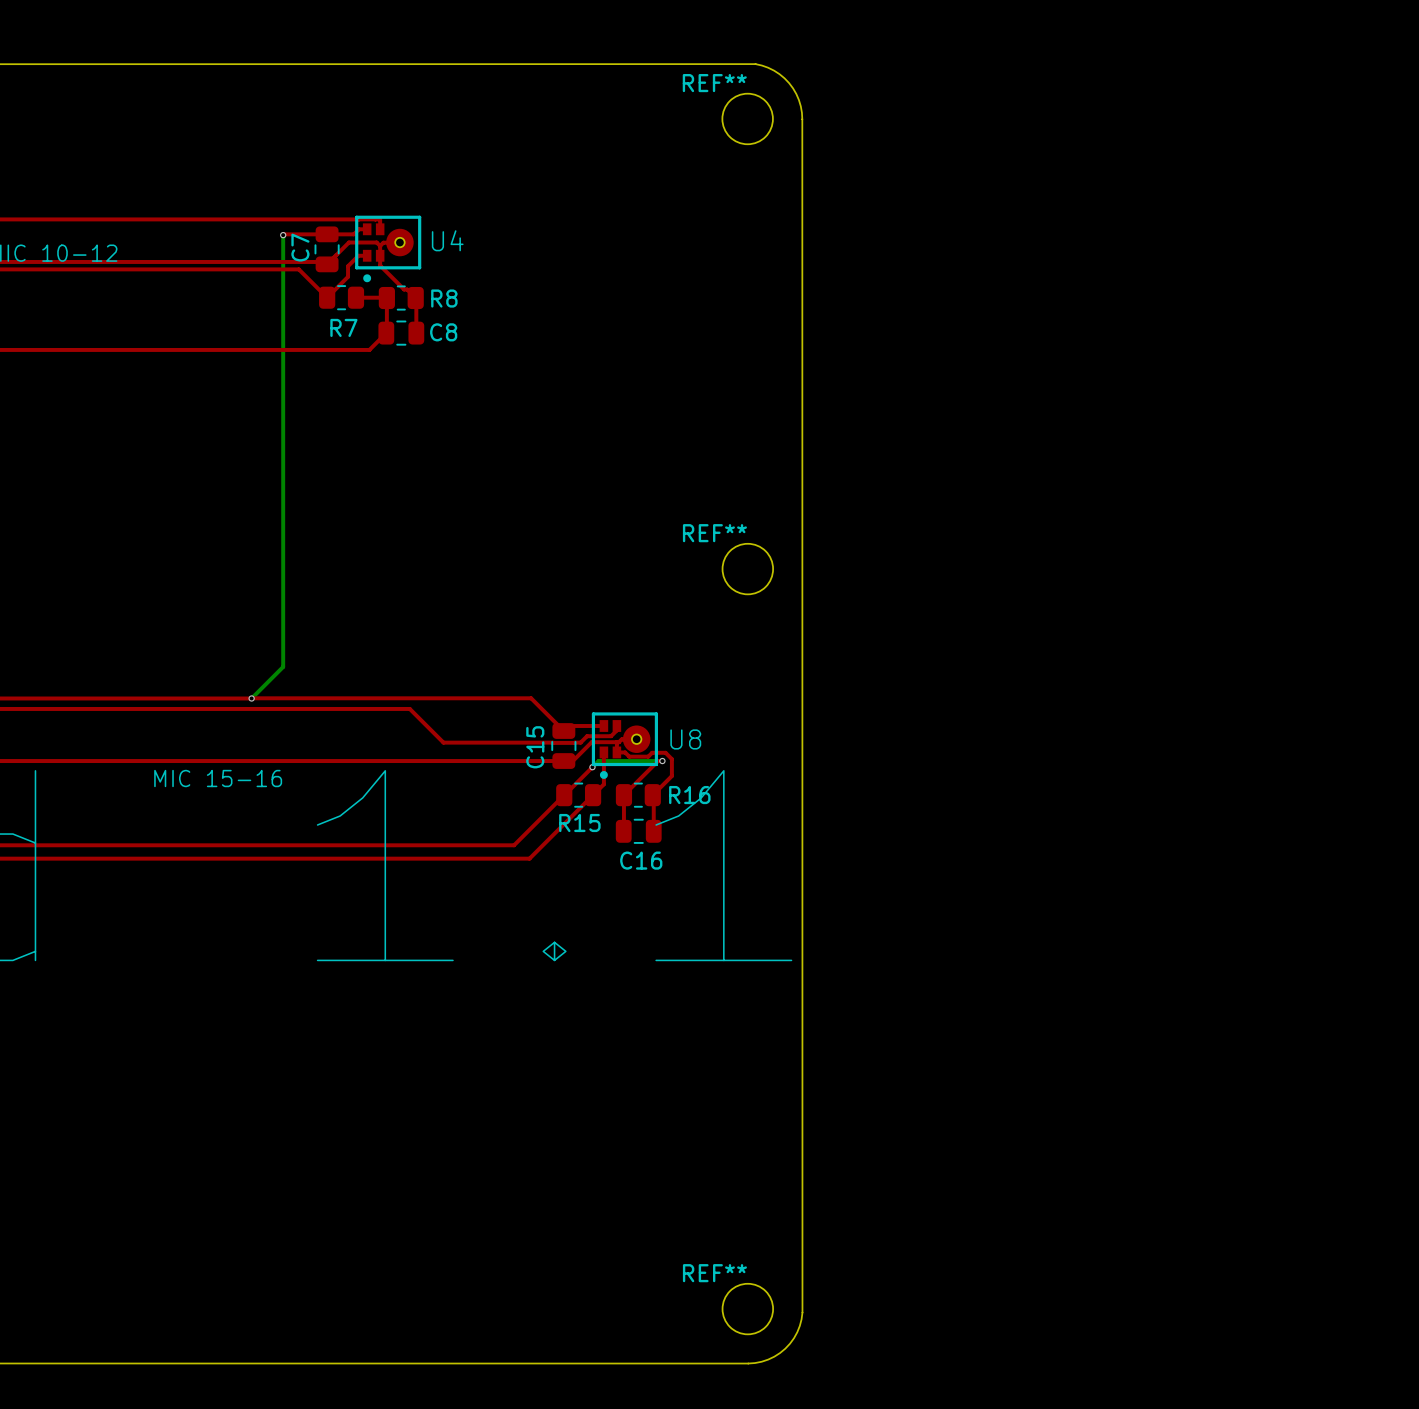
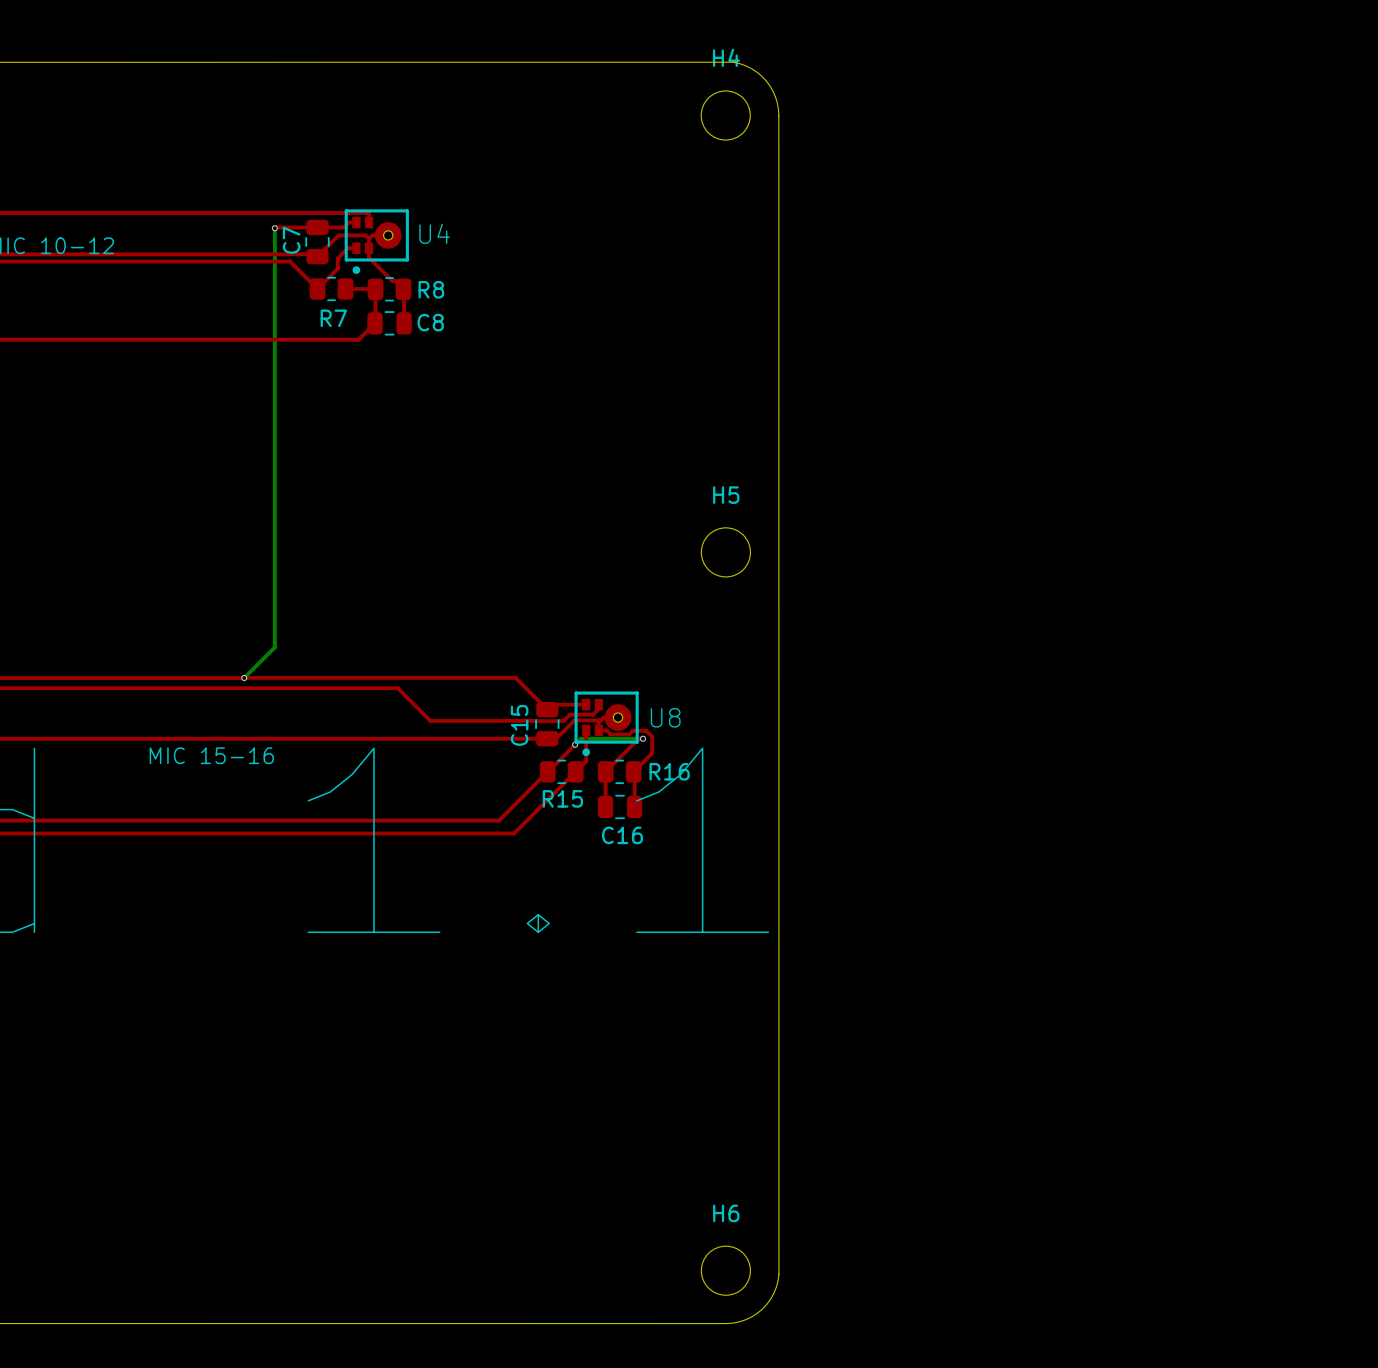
REF** name: REF** (714, 83) -> H4 (726, 57)
REF** name: REF** (714, 533) -> H5 (726, 495)
REF** name: REF** (714, 1273) -> H6 (726, 1213)

